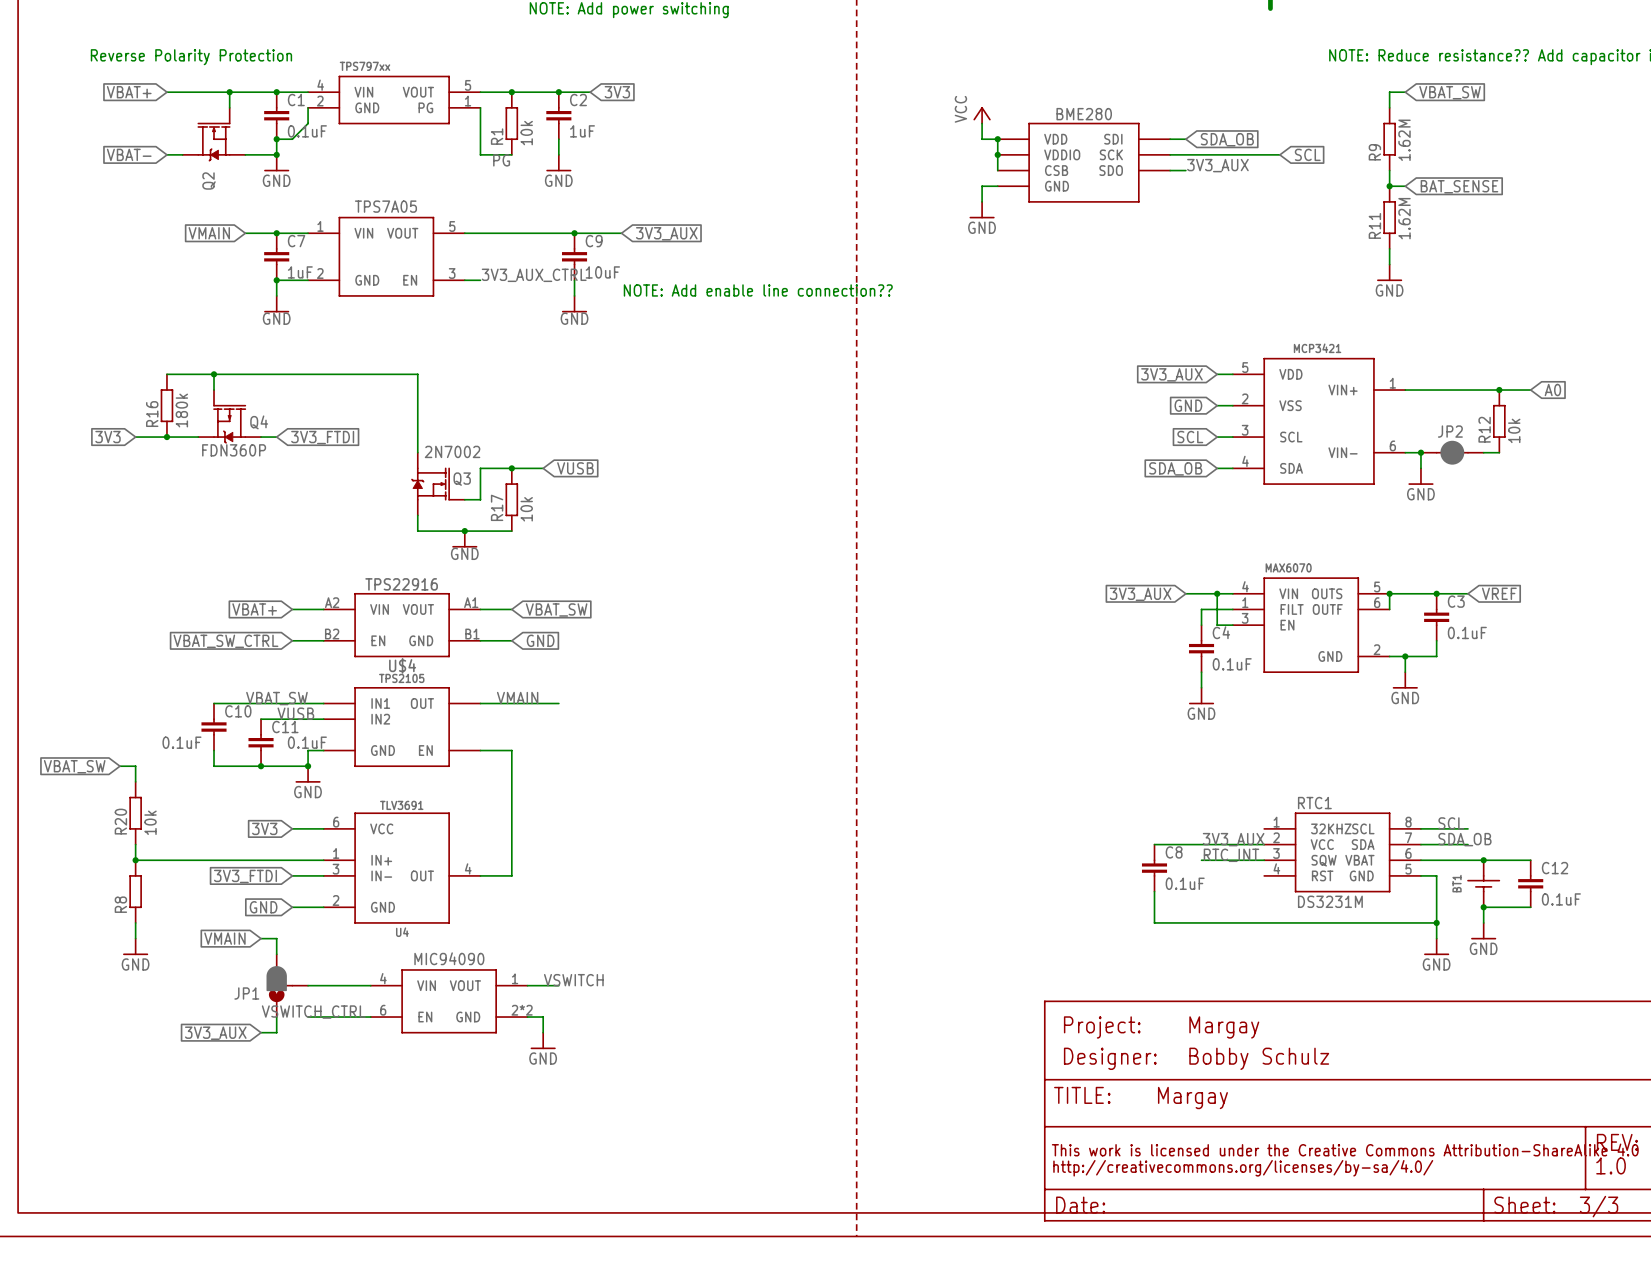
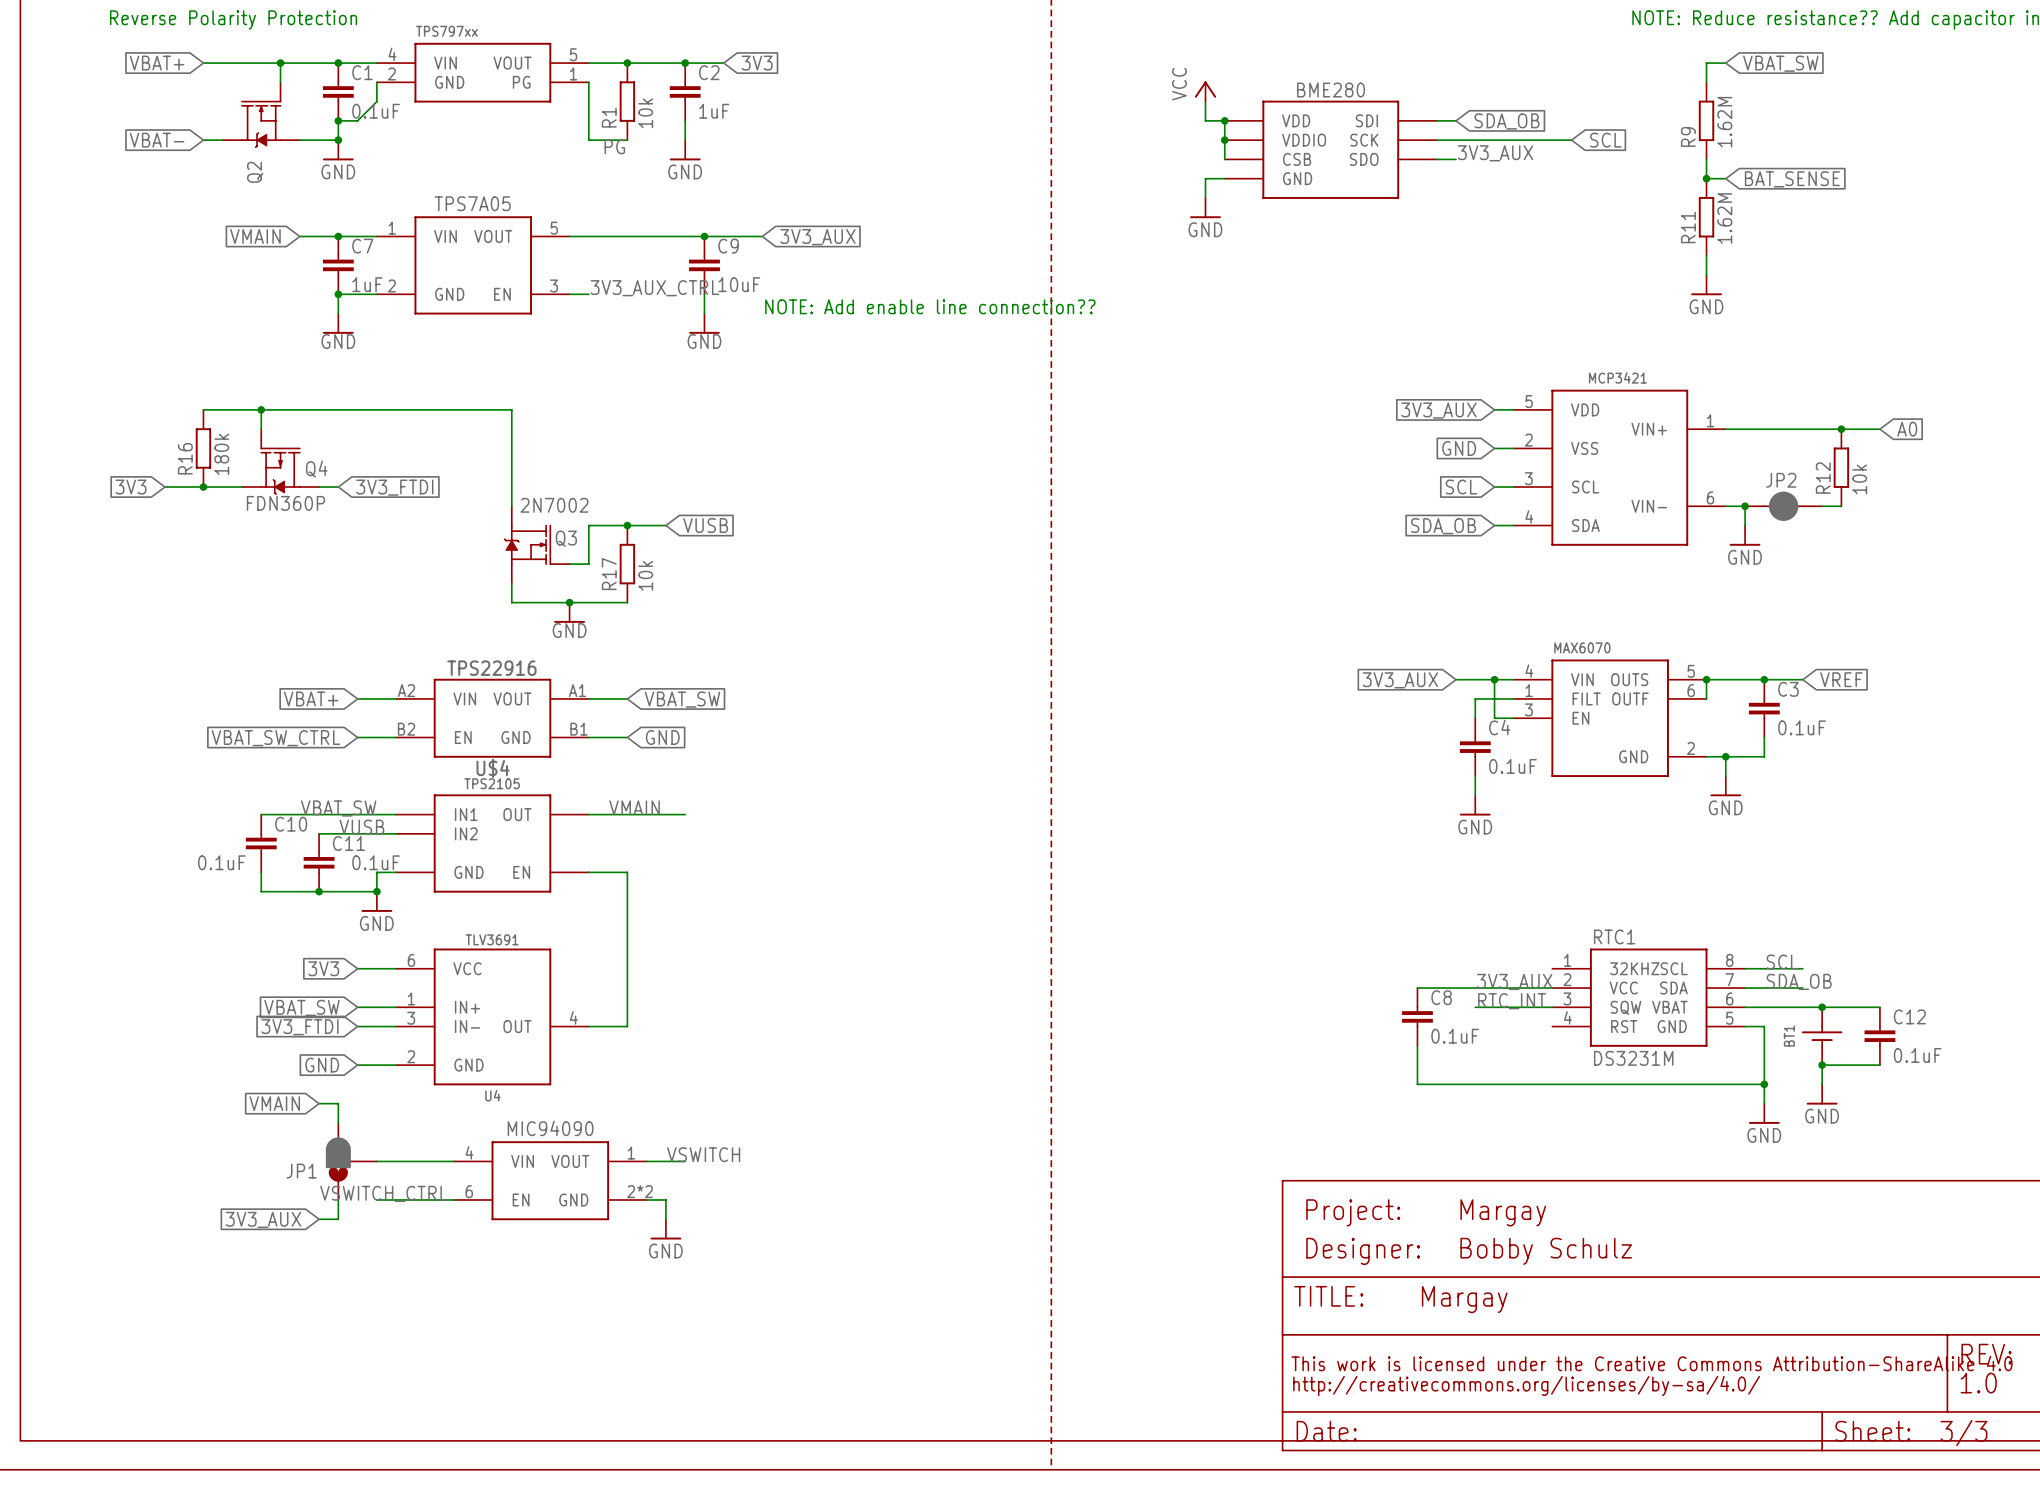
global label: VBAT_SW (74, 766) -> none
wire: (119, 766) (135, 766) (135, 781) -> none
R20: 10k (135, 813) -> none
wire: (135, 844) (135, 860) (292, 860) -> none
junction: (135, 860) -> none
global label: none -> VBAT_SW (301, 1007)
R8: (135, 891) -> none
wire: (135, 922) (135, 938) -> none
power symbol: GND (135, 946) -> none

